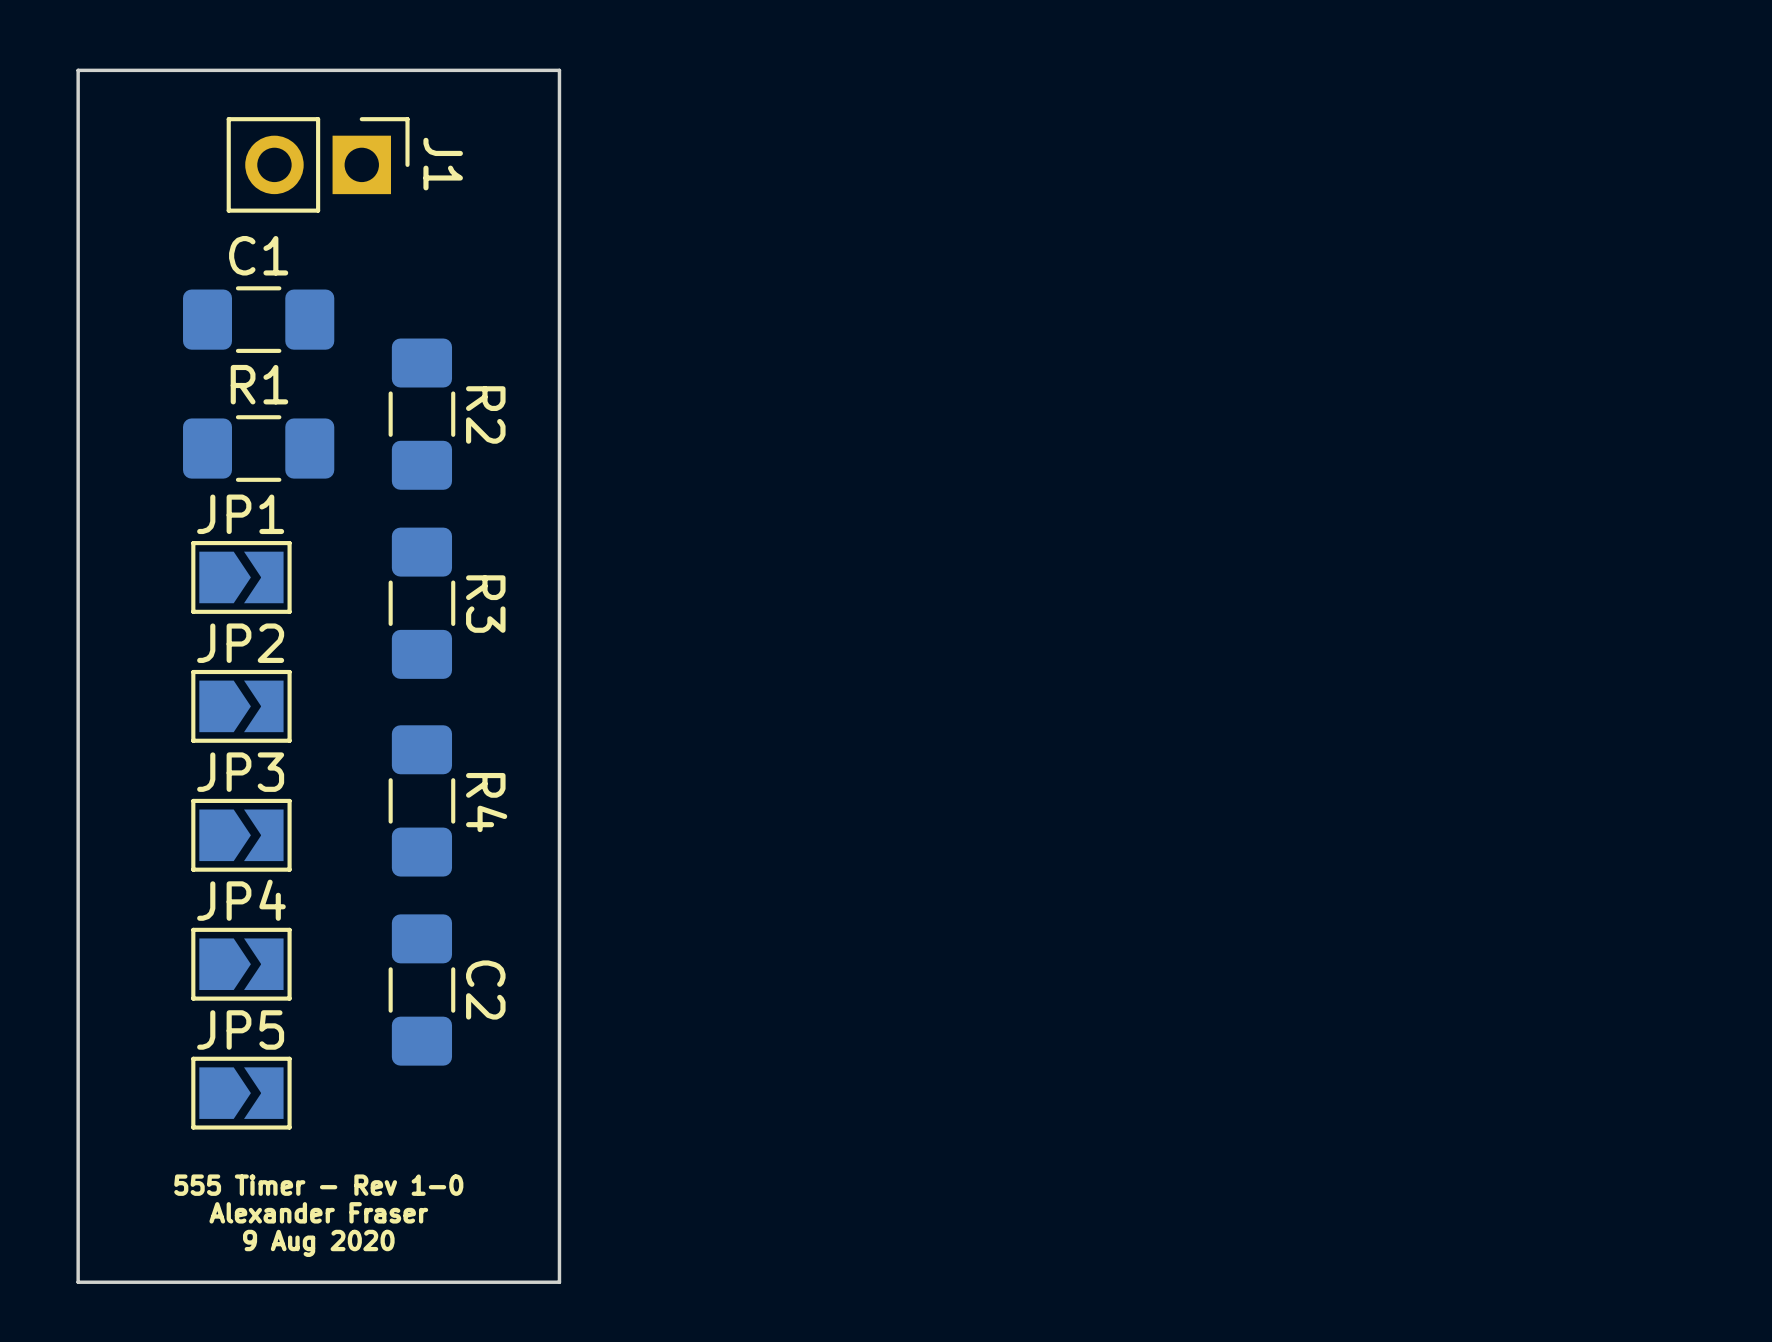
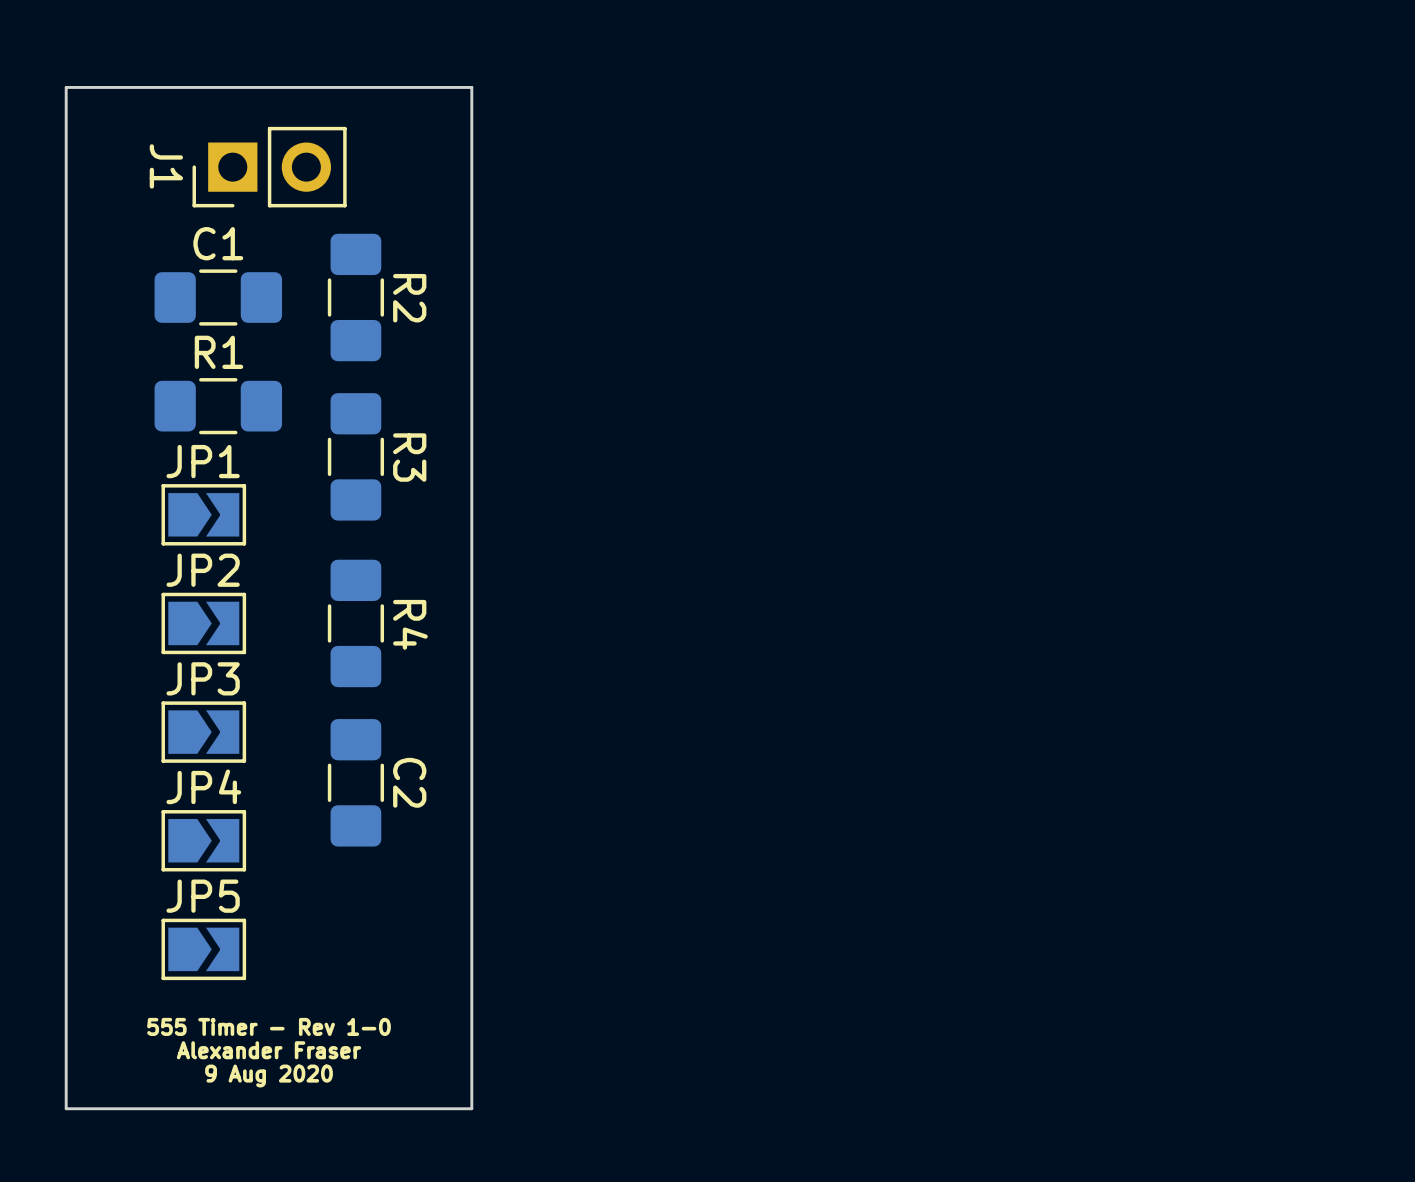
J1 rotation: 0° (318, 164) -> 180° (269, 167)
R2 position: (421, 414) -> (355, 297)
R3 position: (421, 603) -> (355, 456)
R4 position: (421, 800) -> (355, 623)
C2 position: (421, 990) -> (355, 782)

